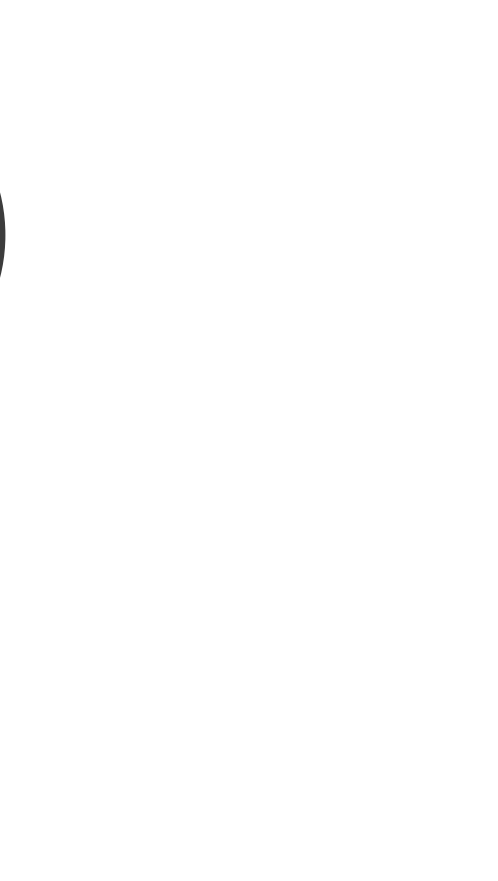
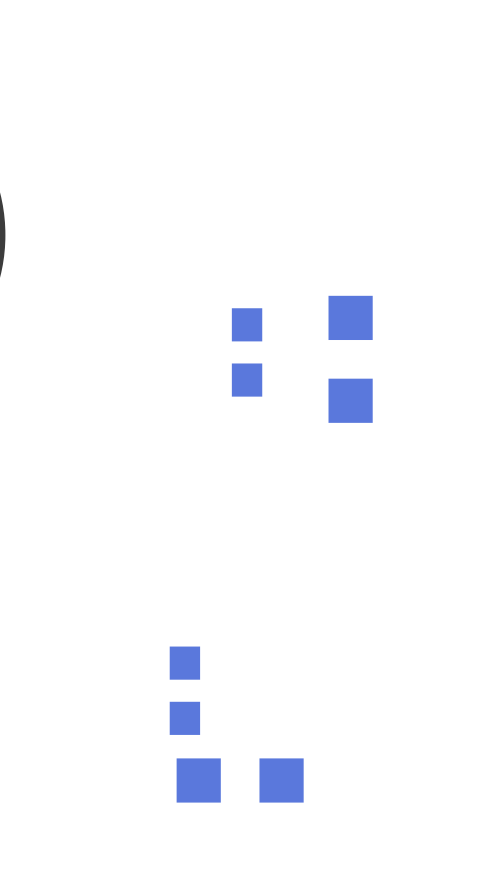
part: none -> (247, 352)
part: none -> (350, 359)
part: none -> (184, 690)
part: none -> (240, 780)

